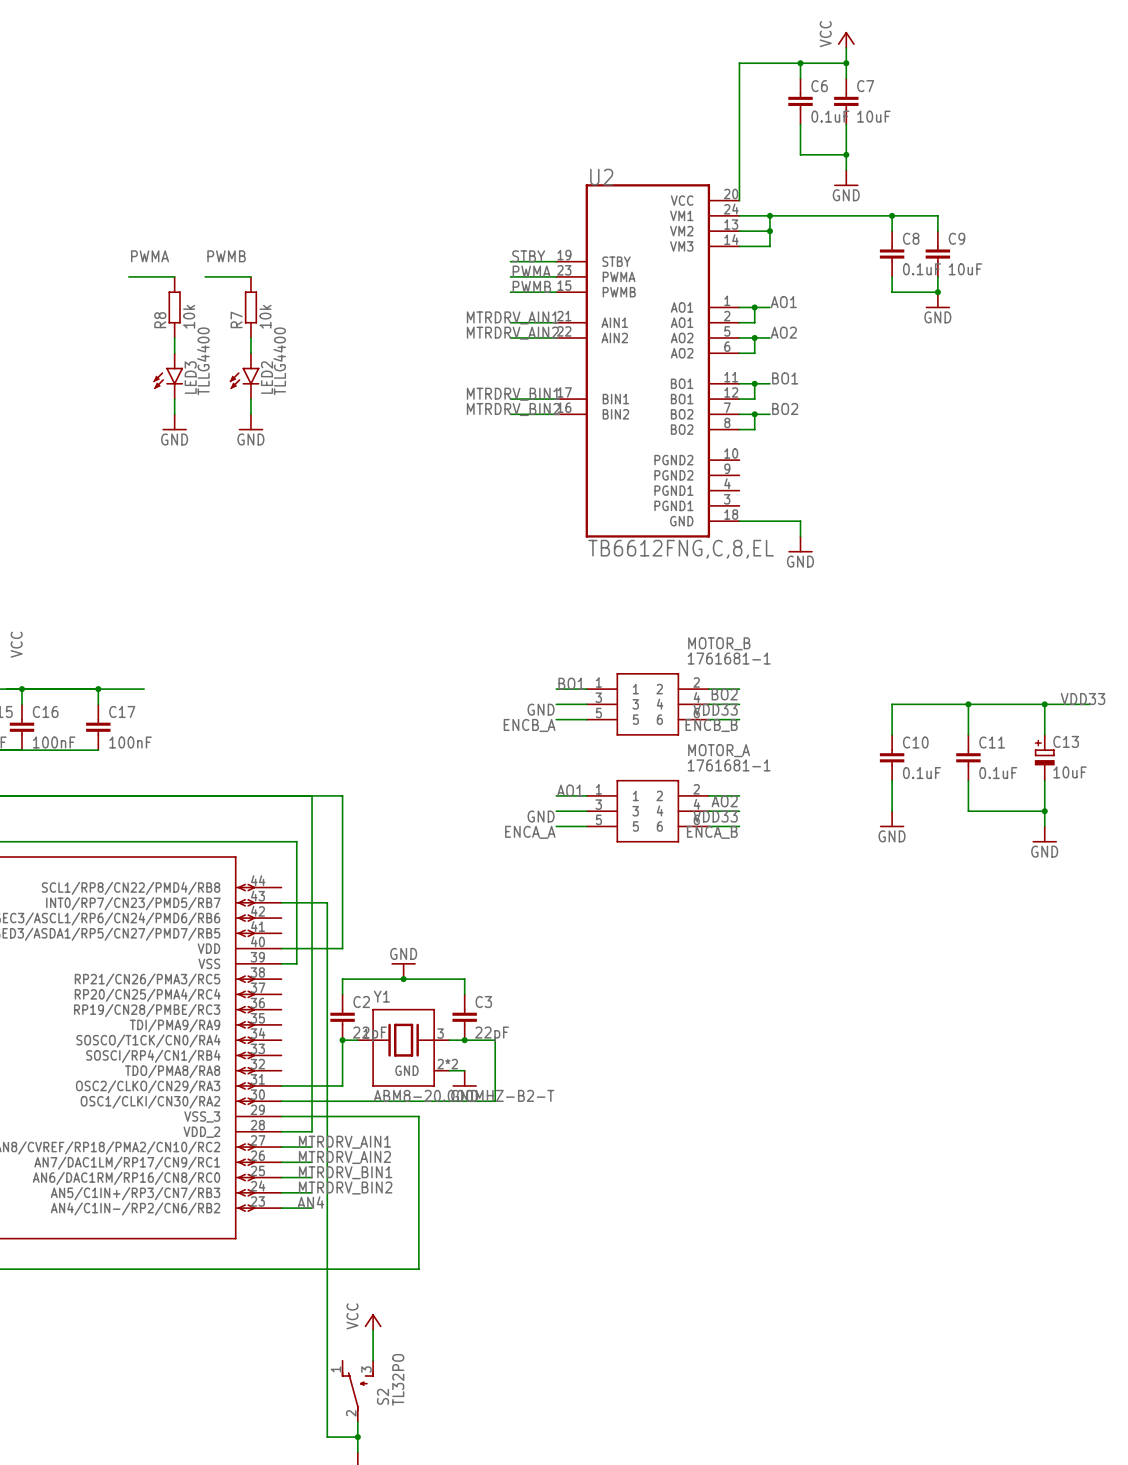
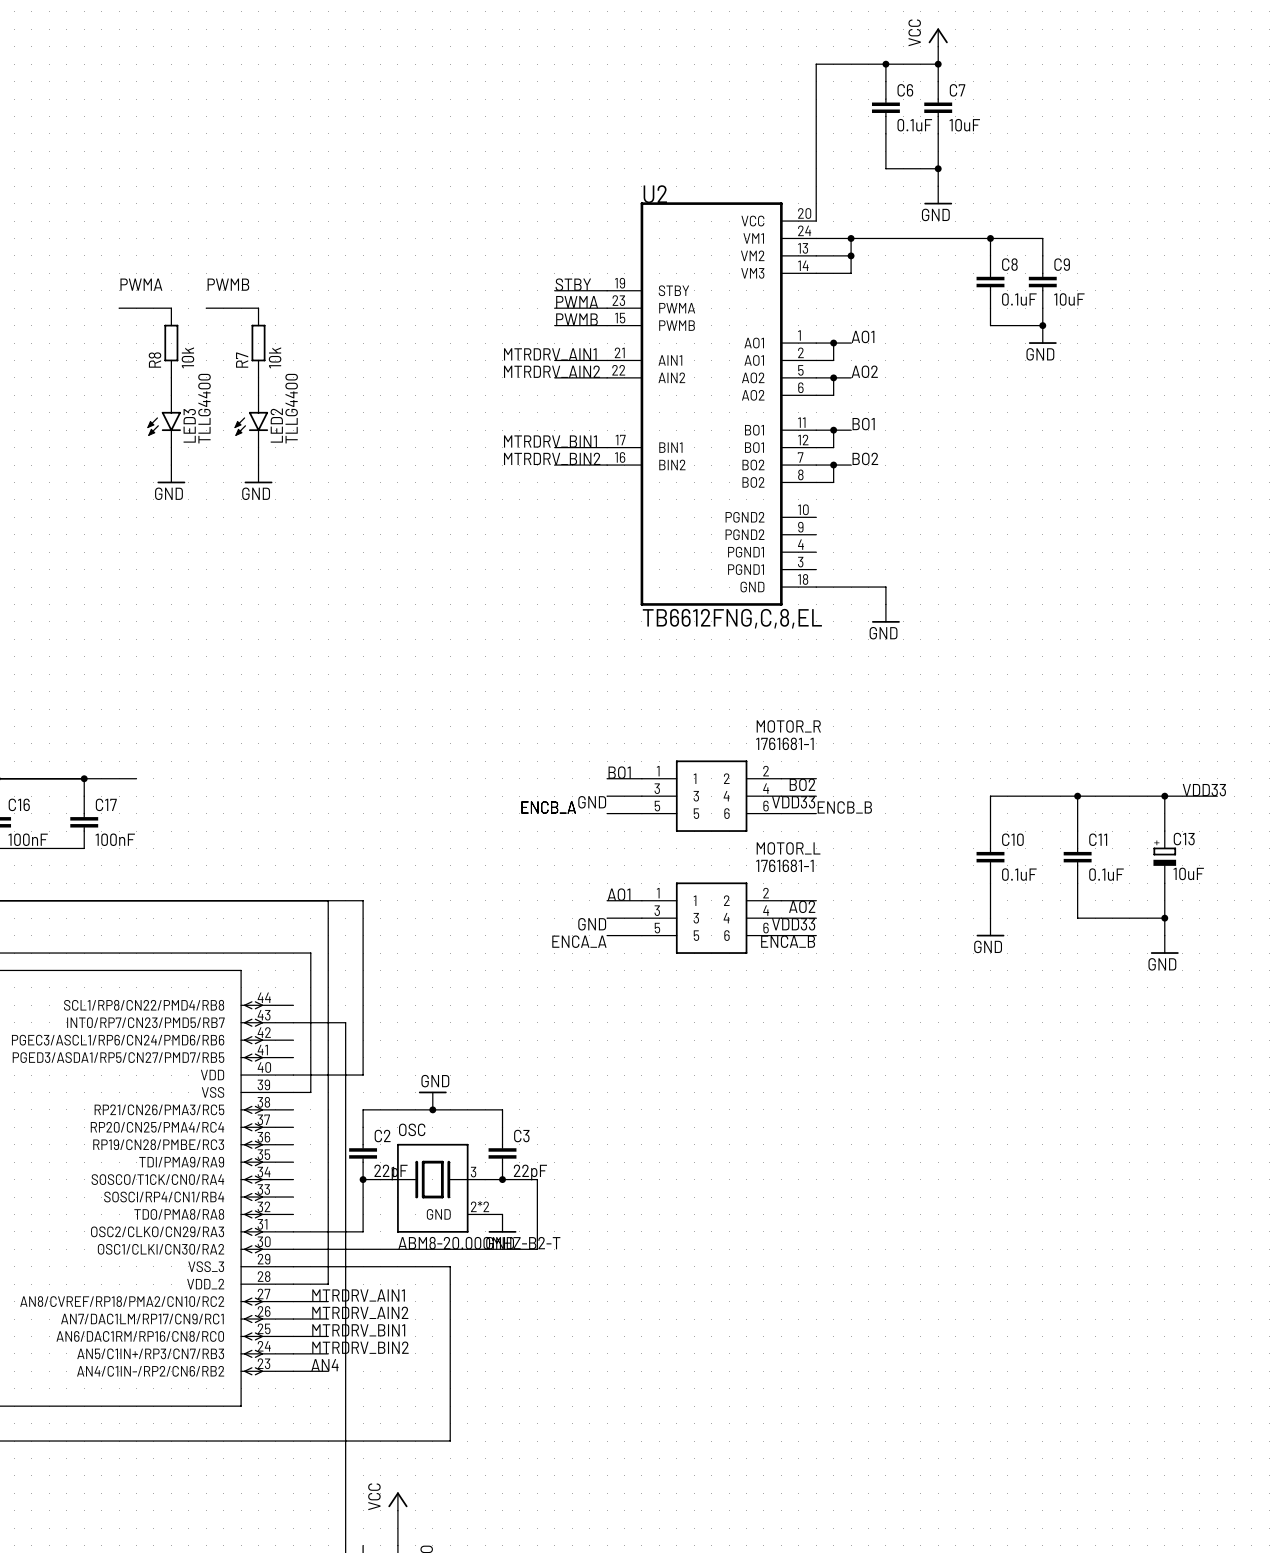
MOTOR_B name: MOTOR_B (719, 643) -> MOTOR_R (788, 726)
label position: ENCB_A (529, 725) -> ENCB_A (548, 807)
label position: ENCB_B (711, 725) -> ENCB_B (844, 807)
MOTOR_A name: MOTOR_A (719, 750) -> MOTOR_L (788, 848)
Y1 name: Y1 (381, 996) -> OSC (412, 1129)

